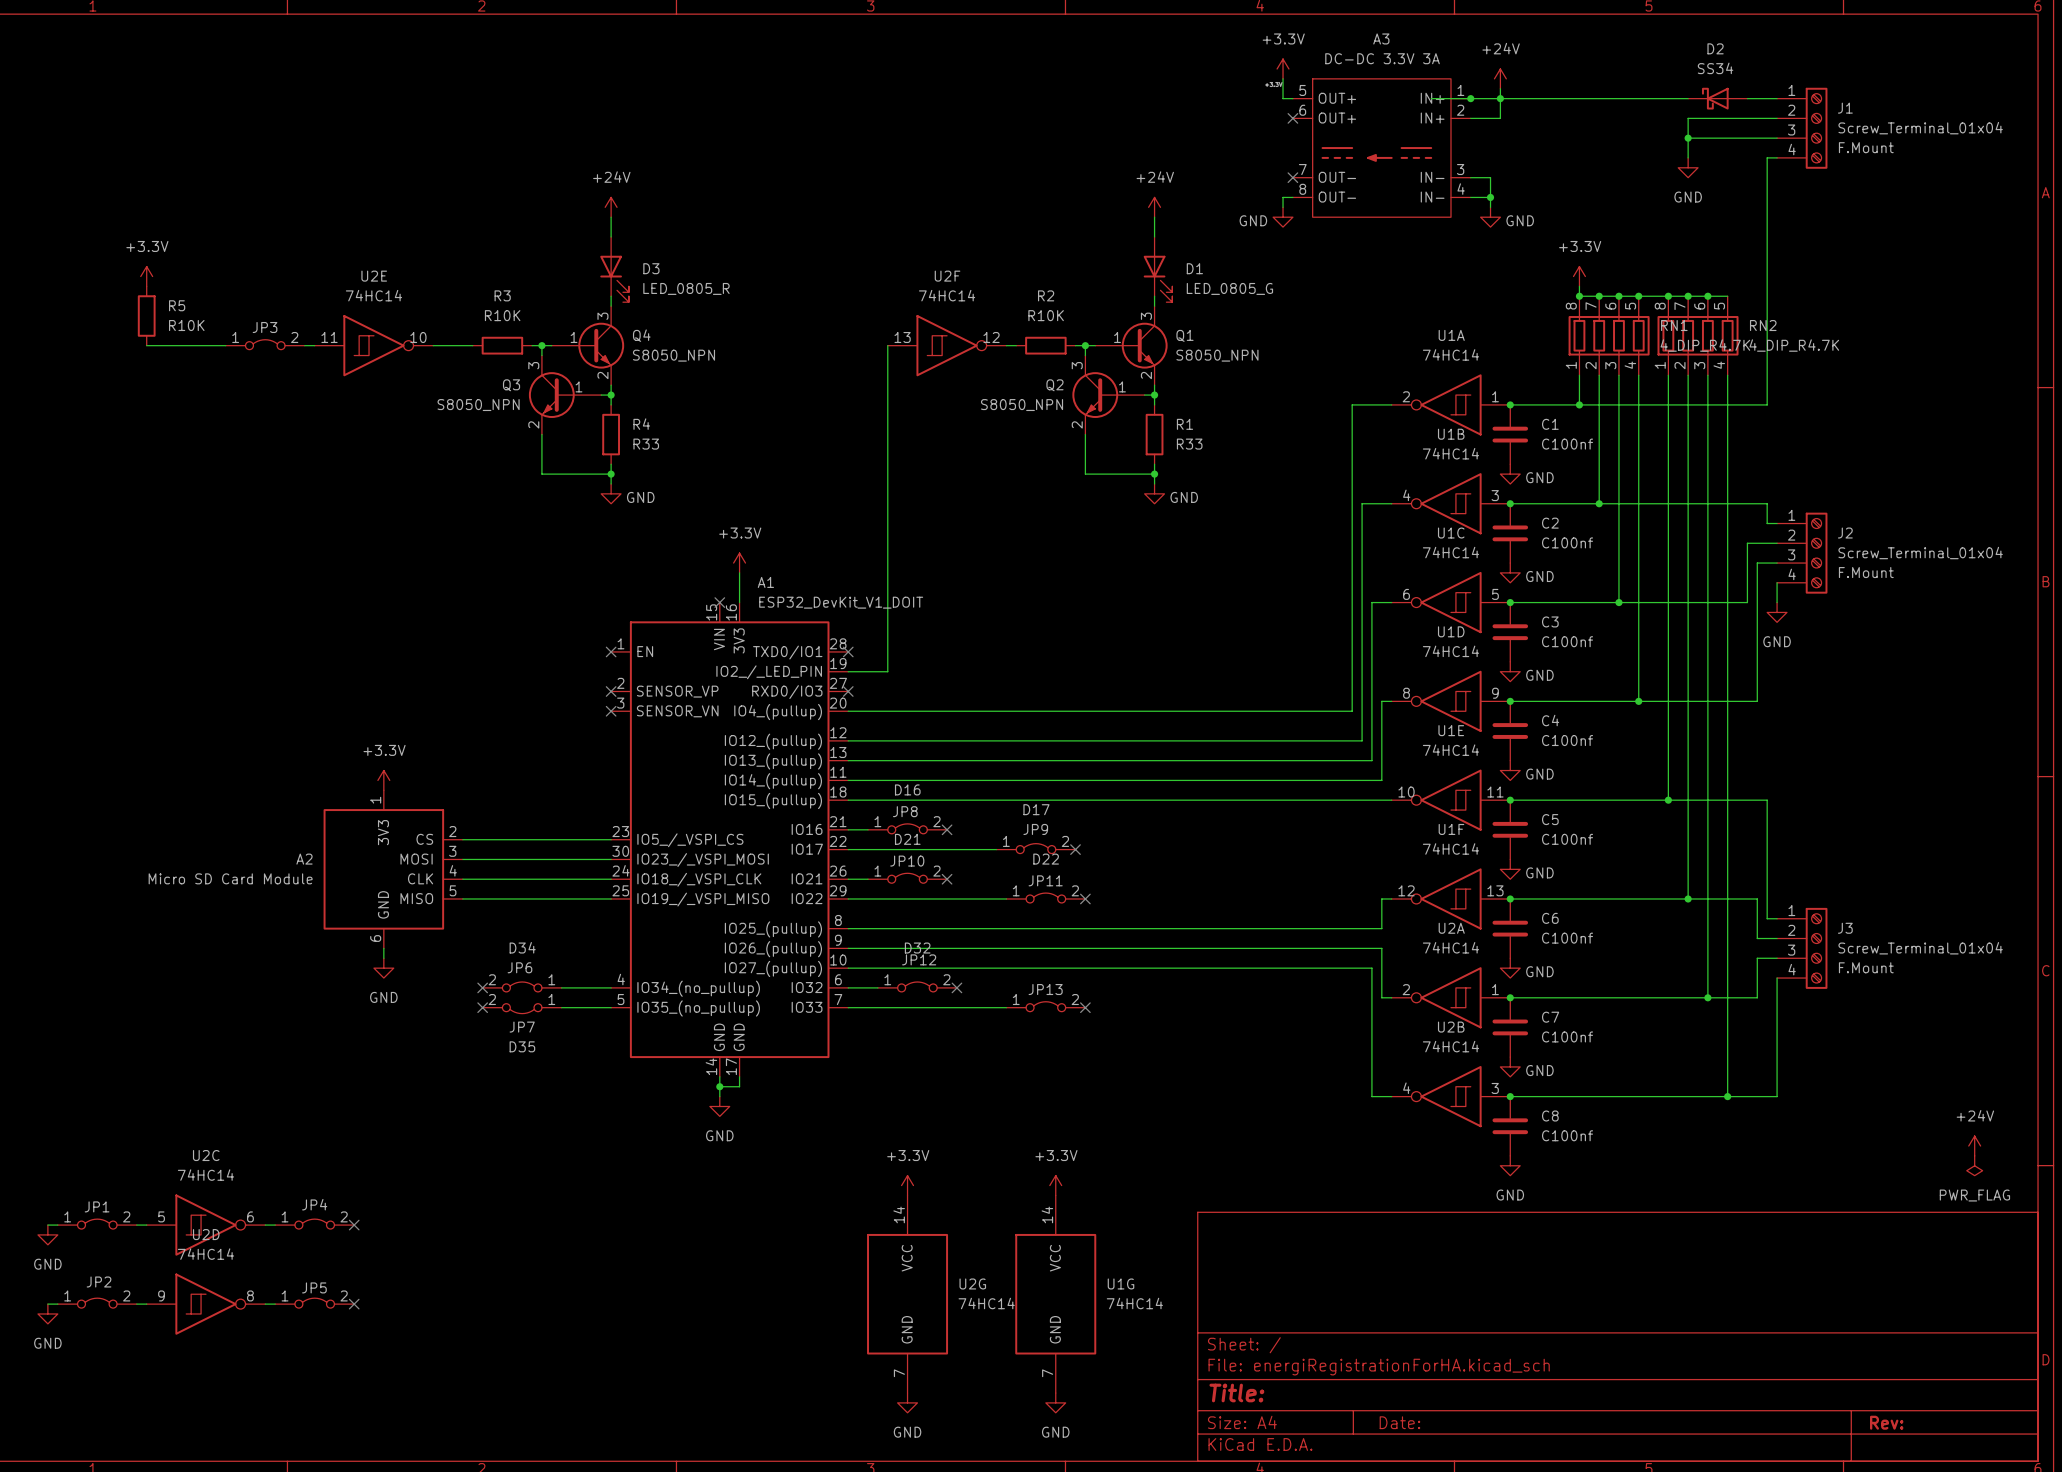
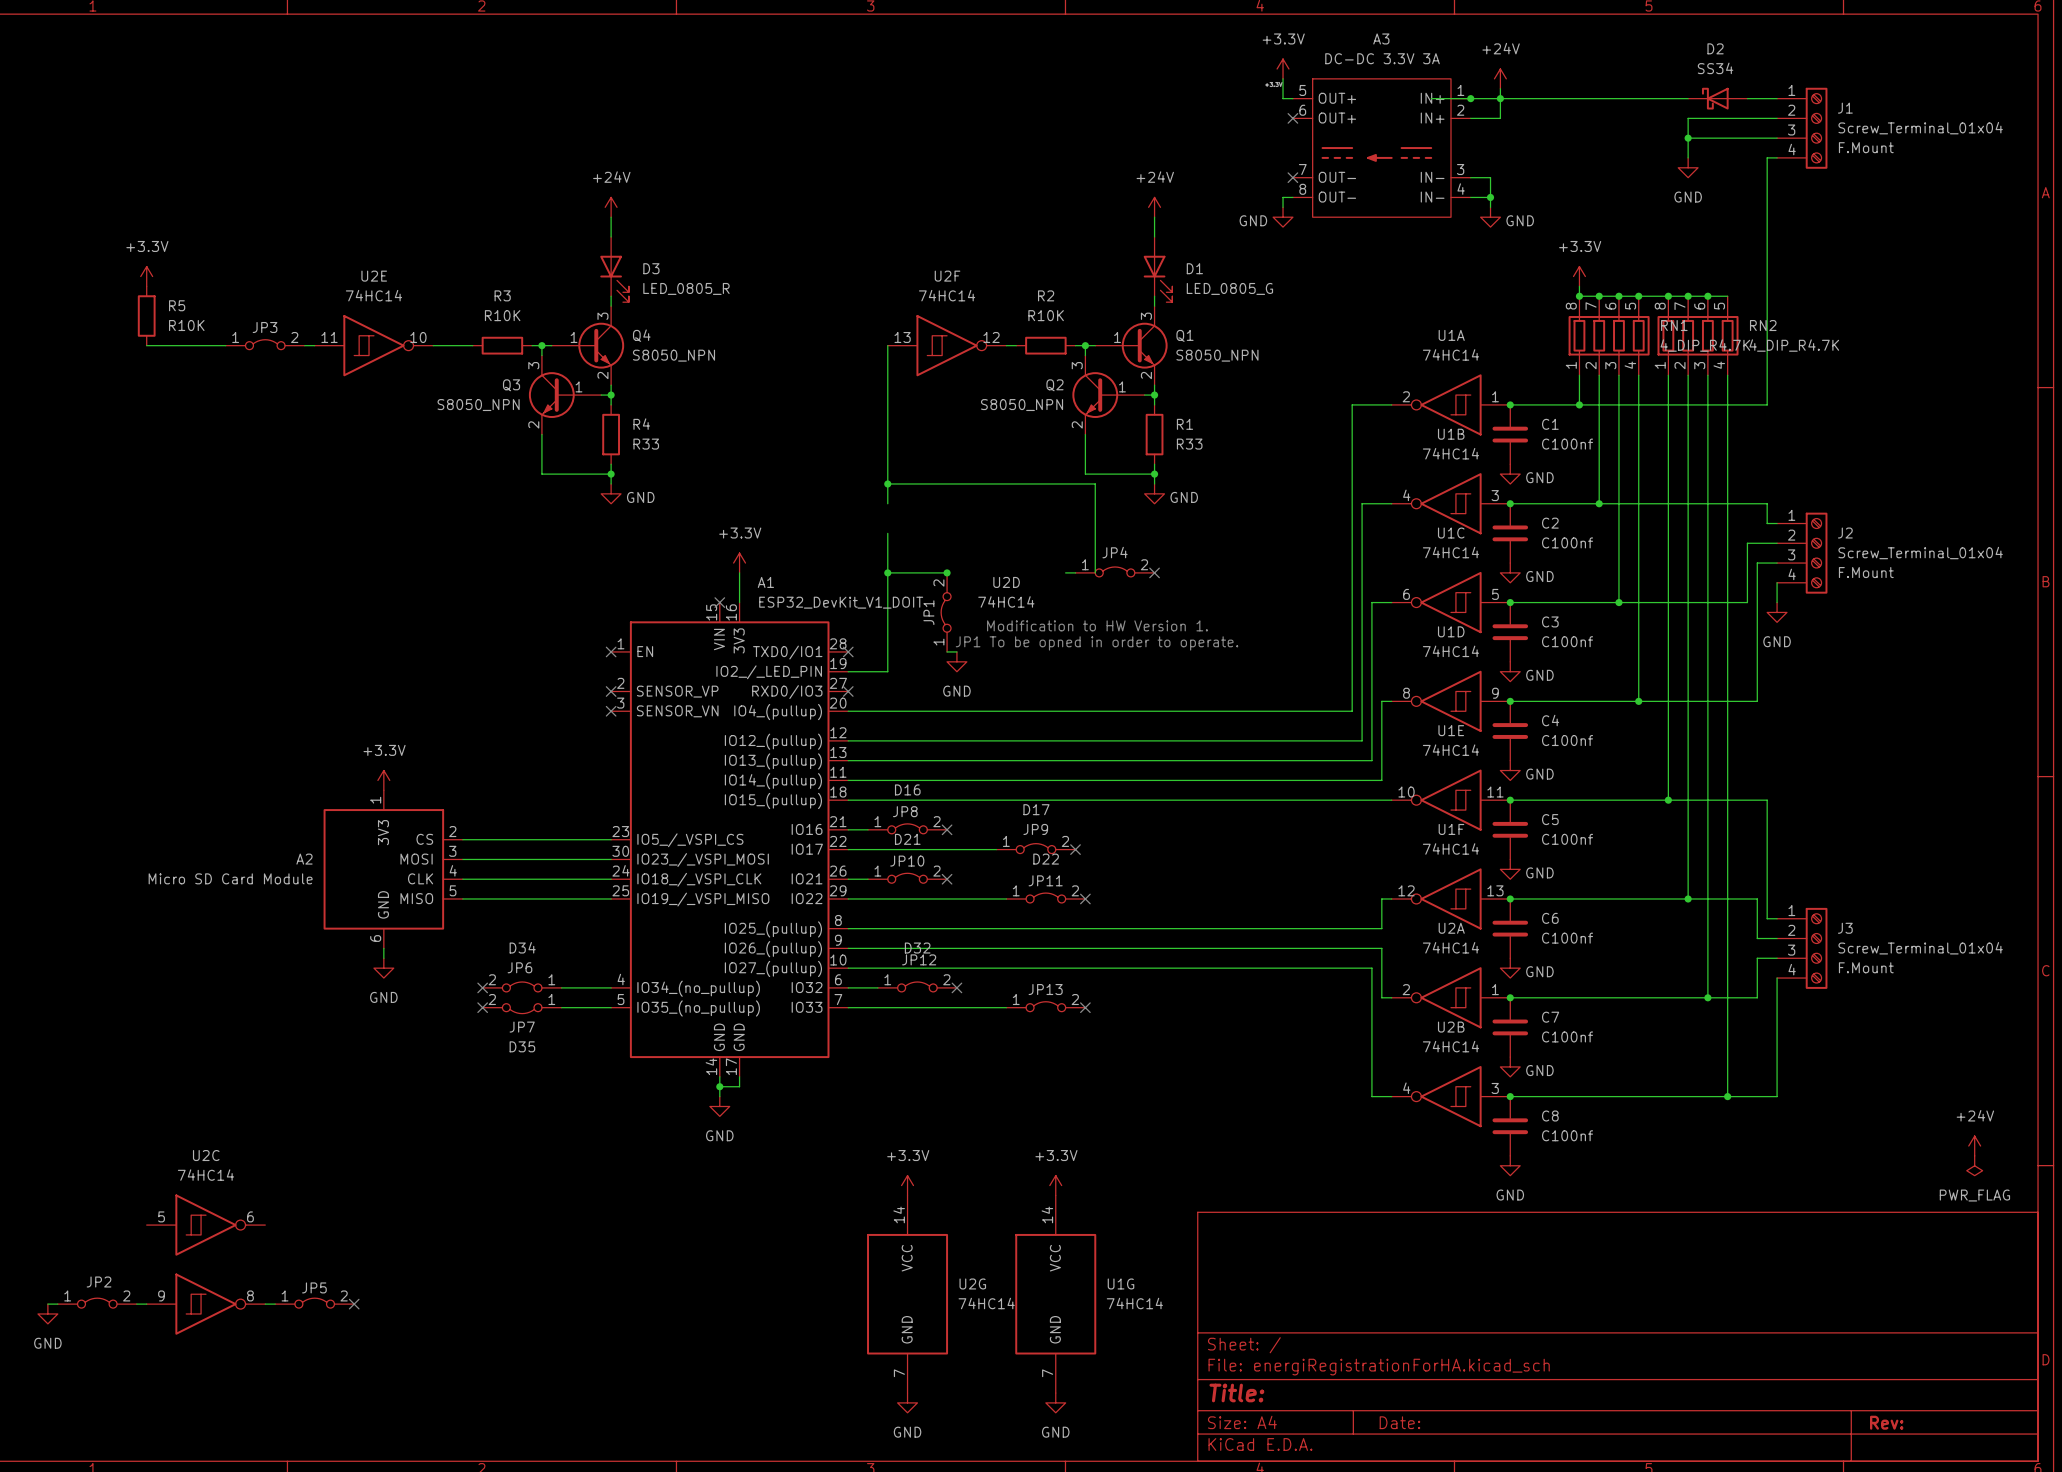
wire: none -> (887, 483) (1095, 483) (1095, 572)
junction: none -> (887, 483)
wire: (887, 503) (887, 533) -> none
wire: none -> (887, 572) (947, 572)
junction: none -> (887, 572)
junction: none -> (947, 572)
wire: none -> (1065, 572) (1075, 572)
no-connect mark: none -> (1154, 572)
text: none -> Modification to HW Version 1. (1097, 625)
text: none -> JP1 To be opned in order to operate. (1097, 643)
wire: none -> (947, 651) (956, 651)
power symbol: none -> GND (956, 661)
JP1 rotation: 0° (97, 1224) -> 90° counterclockwise (946, 612)
JP1 position: (97, 1224) -> (946, 612)
JP4 position: (314, 1224) -> (1115, 571)
wire: (47, 1225) (57, 1225) -> none
wire: (136, 1225) (146, 1225) -> none
wire: (265, 1225) (275, 1225) -> none
no-connect mark: (354, 1225) -> none
power symbol: GND (47, 1234) -> none
U2D name position: U2D (206, 1234) -> U2D (1006, 582)
U2D value position: 74HC14 (205, 1254) -> 74HC14 (1006, 601)

